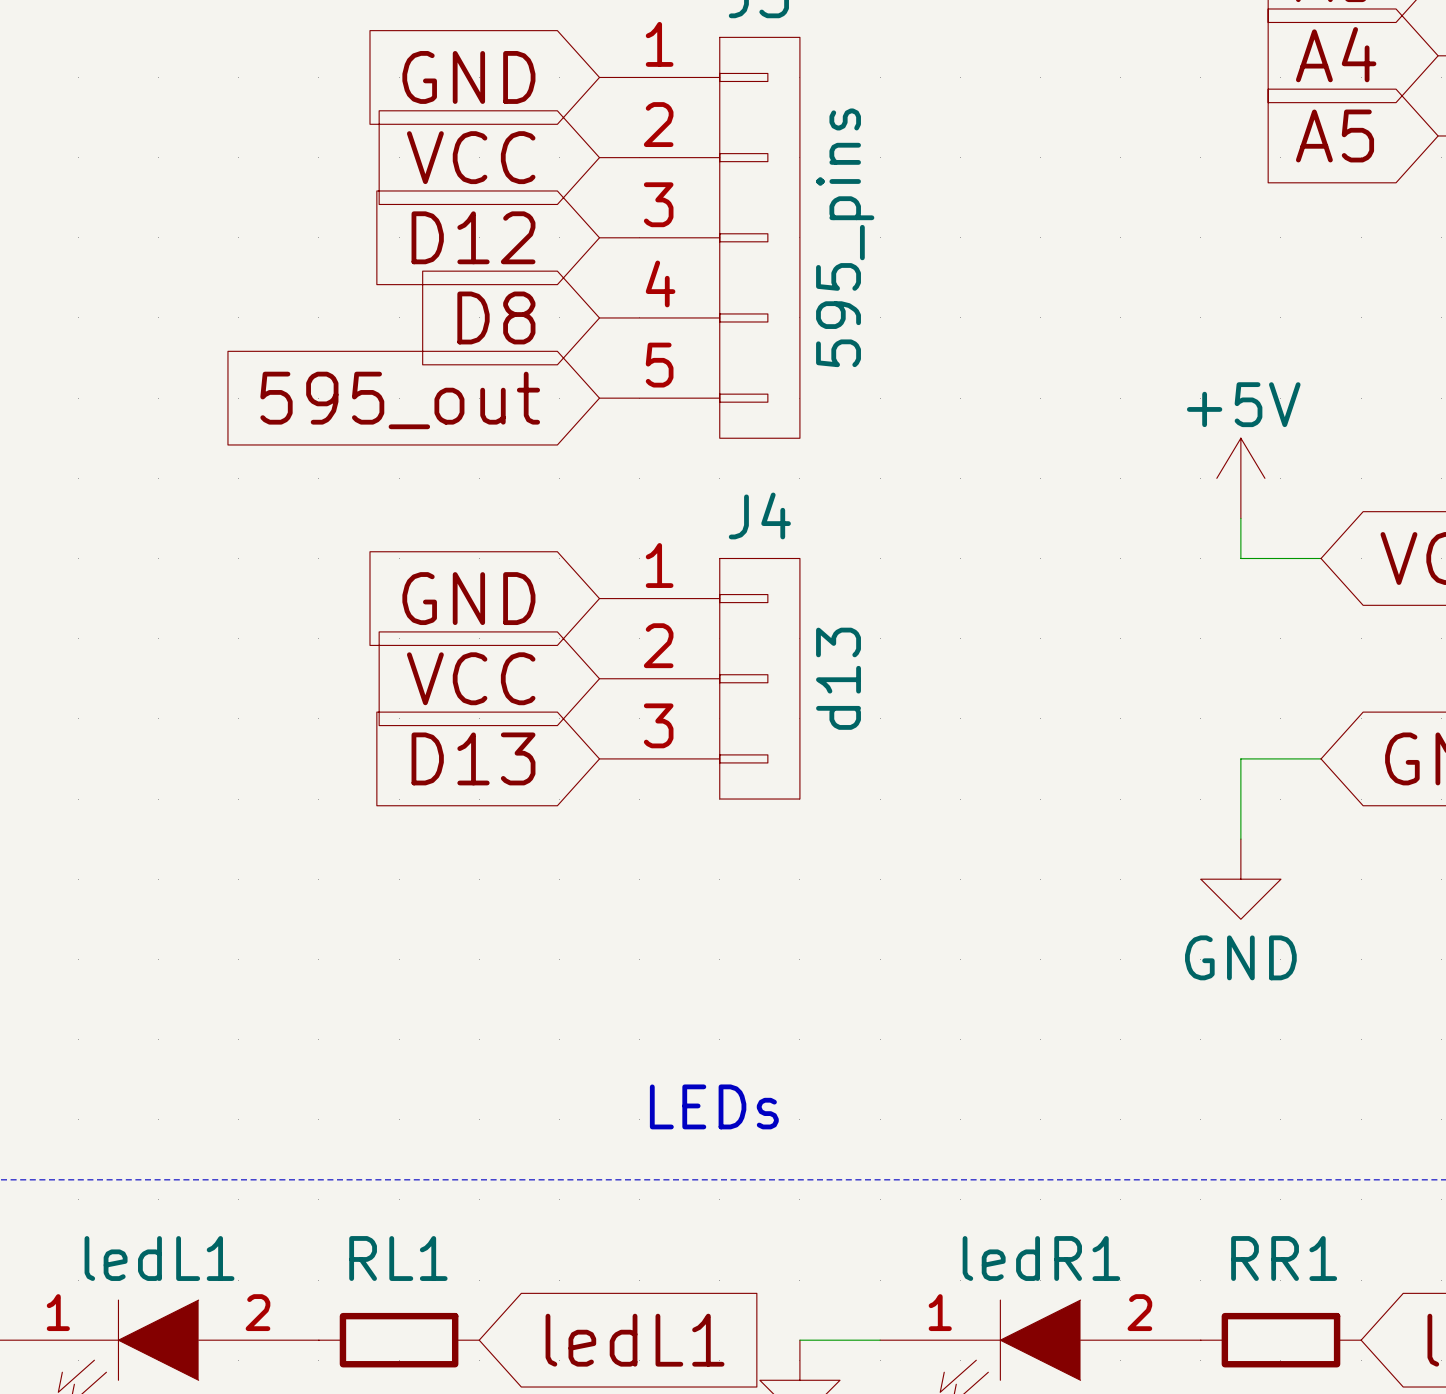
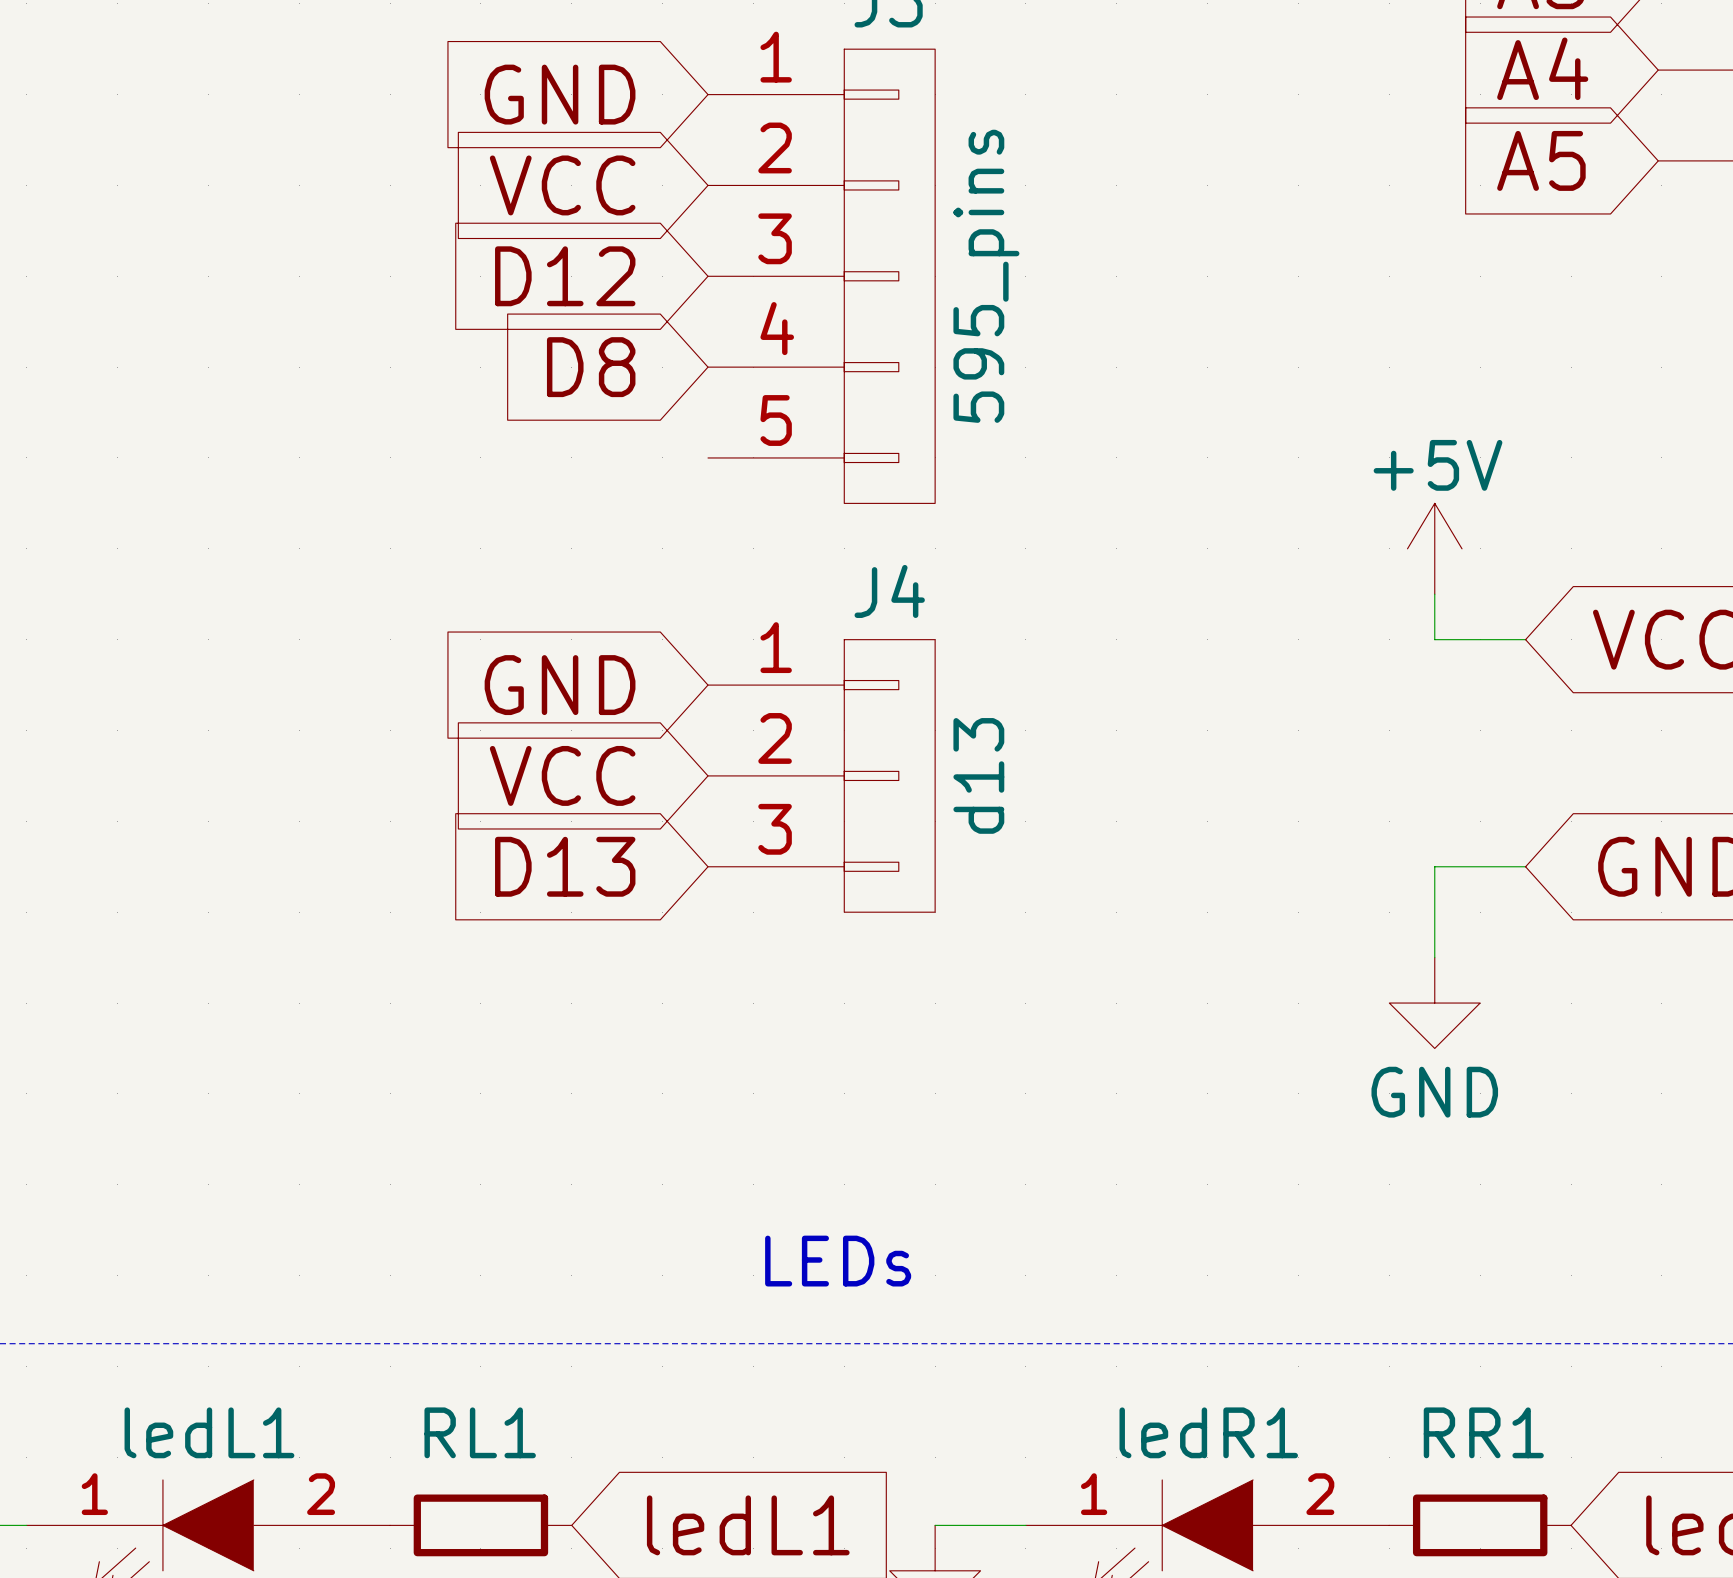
global label: 595_out (400, 400) -> none

